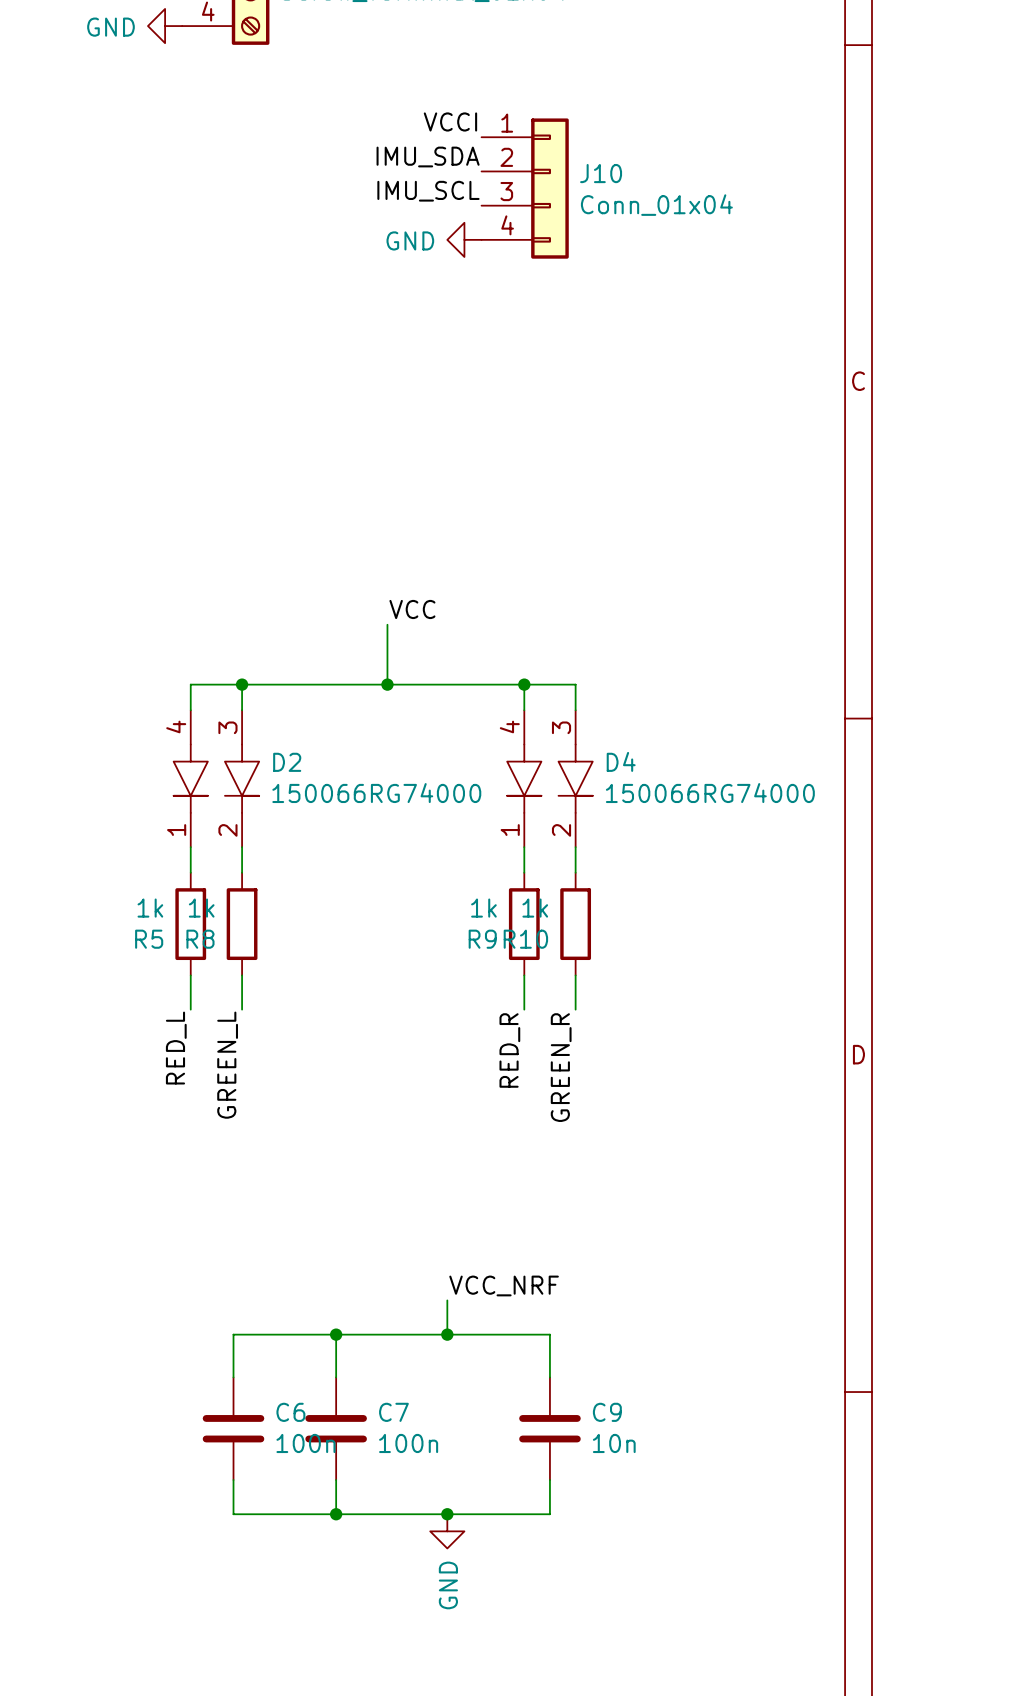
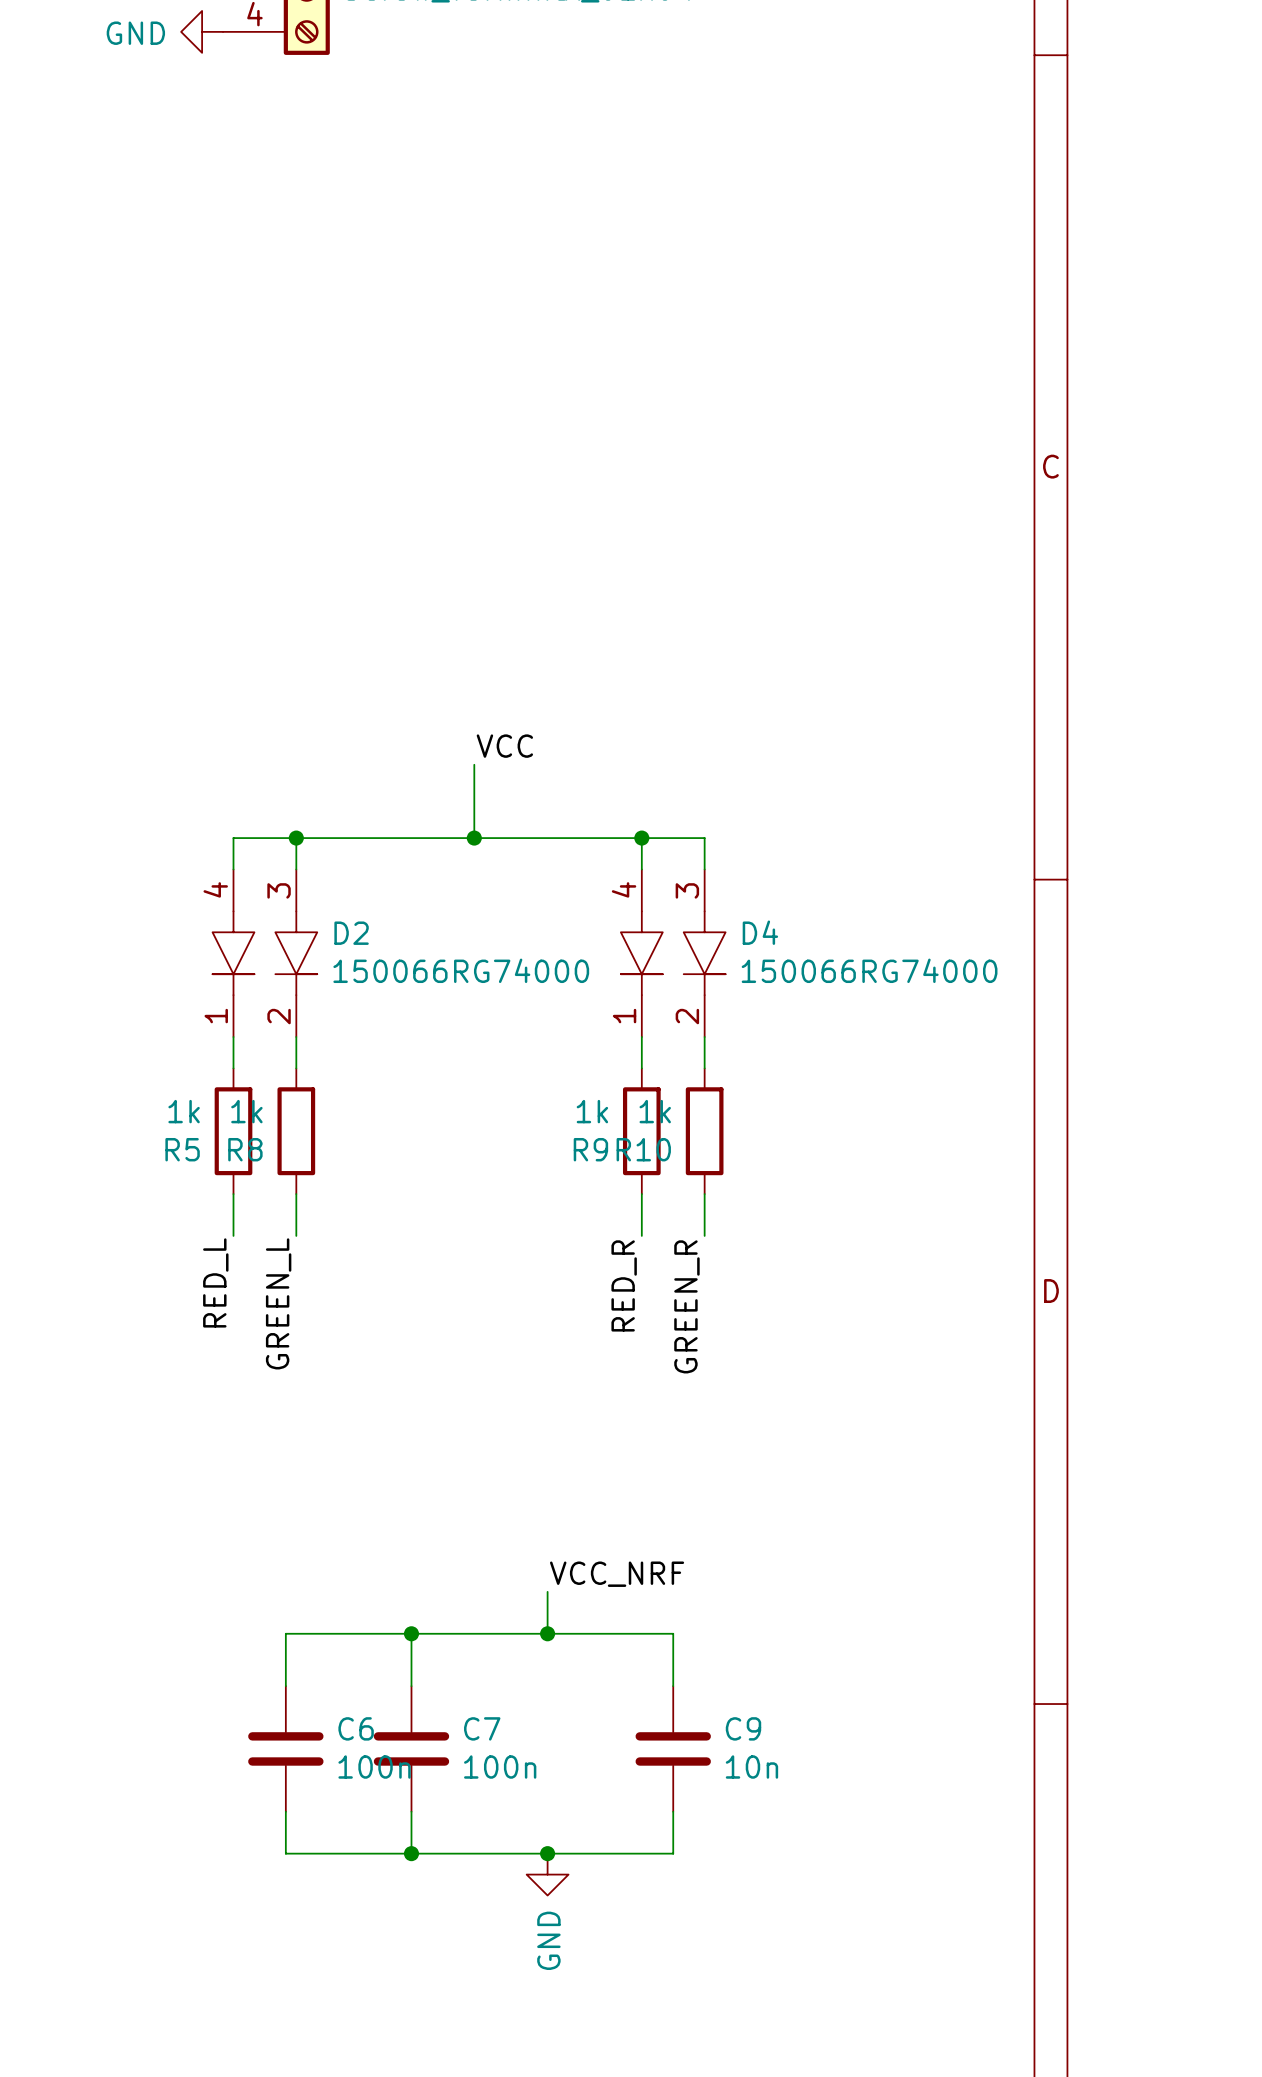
label: VCCI (450, 121) -> none
label: IMU_SDA (428, 157) -> none
J10: Conn_01x04 (525, 188) -> none
label: IMU_SCL (428, 191) -> none
power symbol: GND (464, 239) -> none

